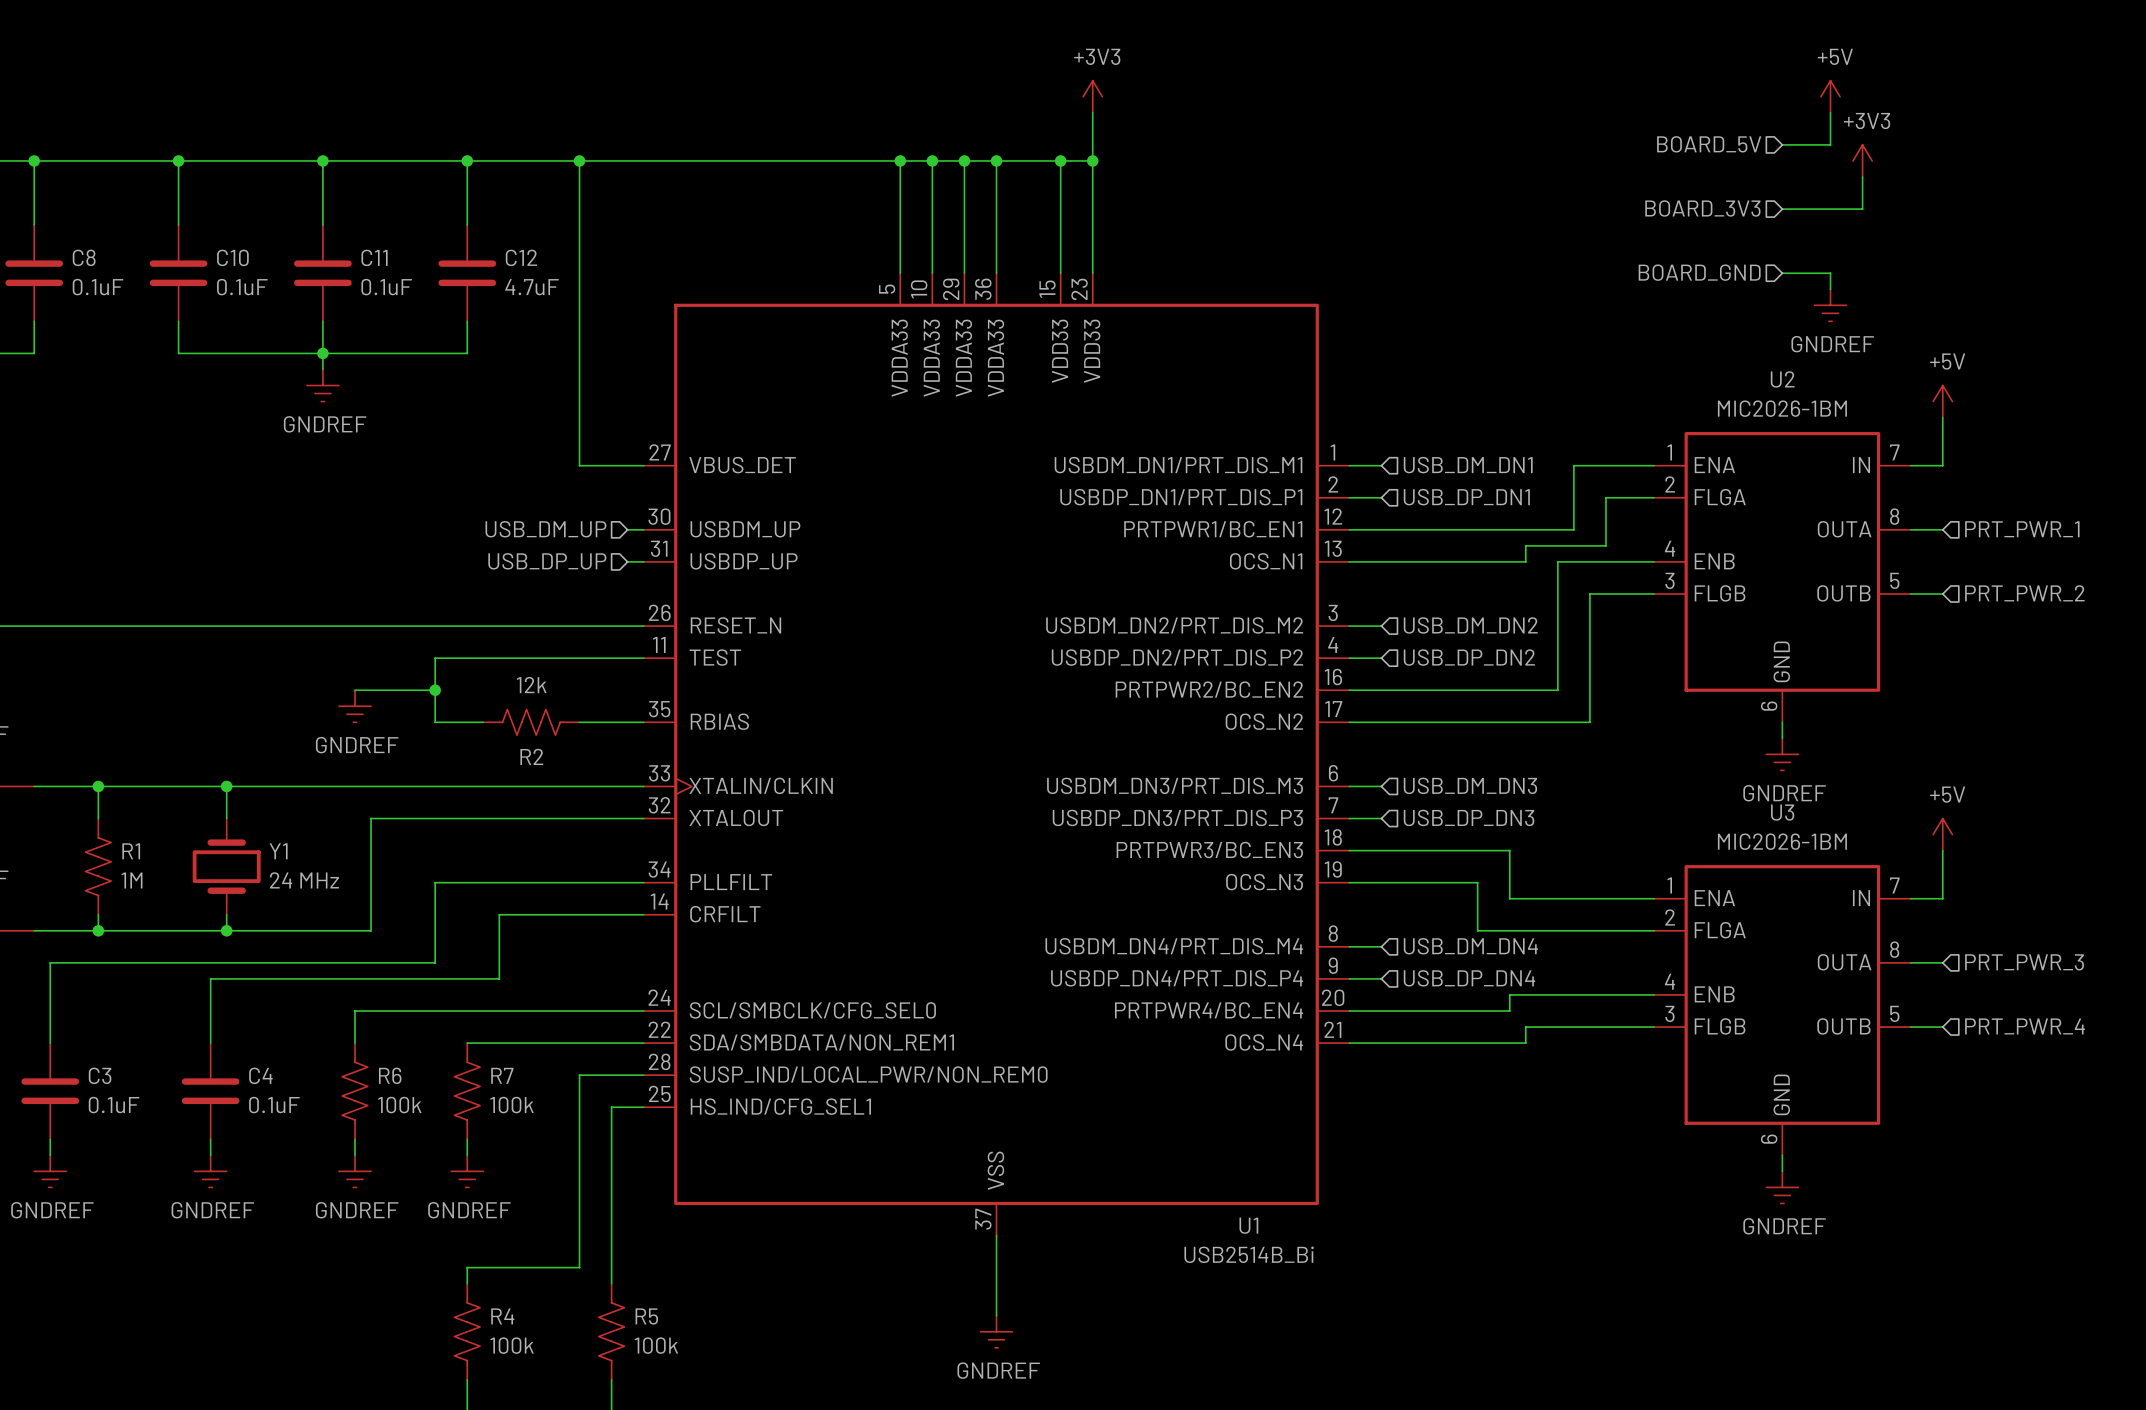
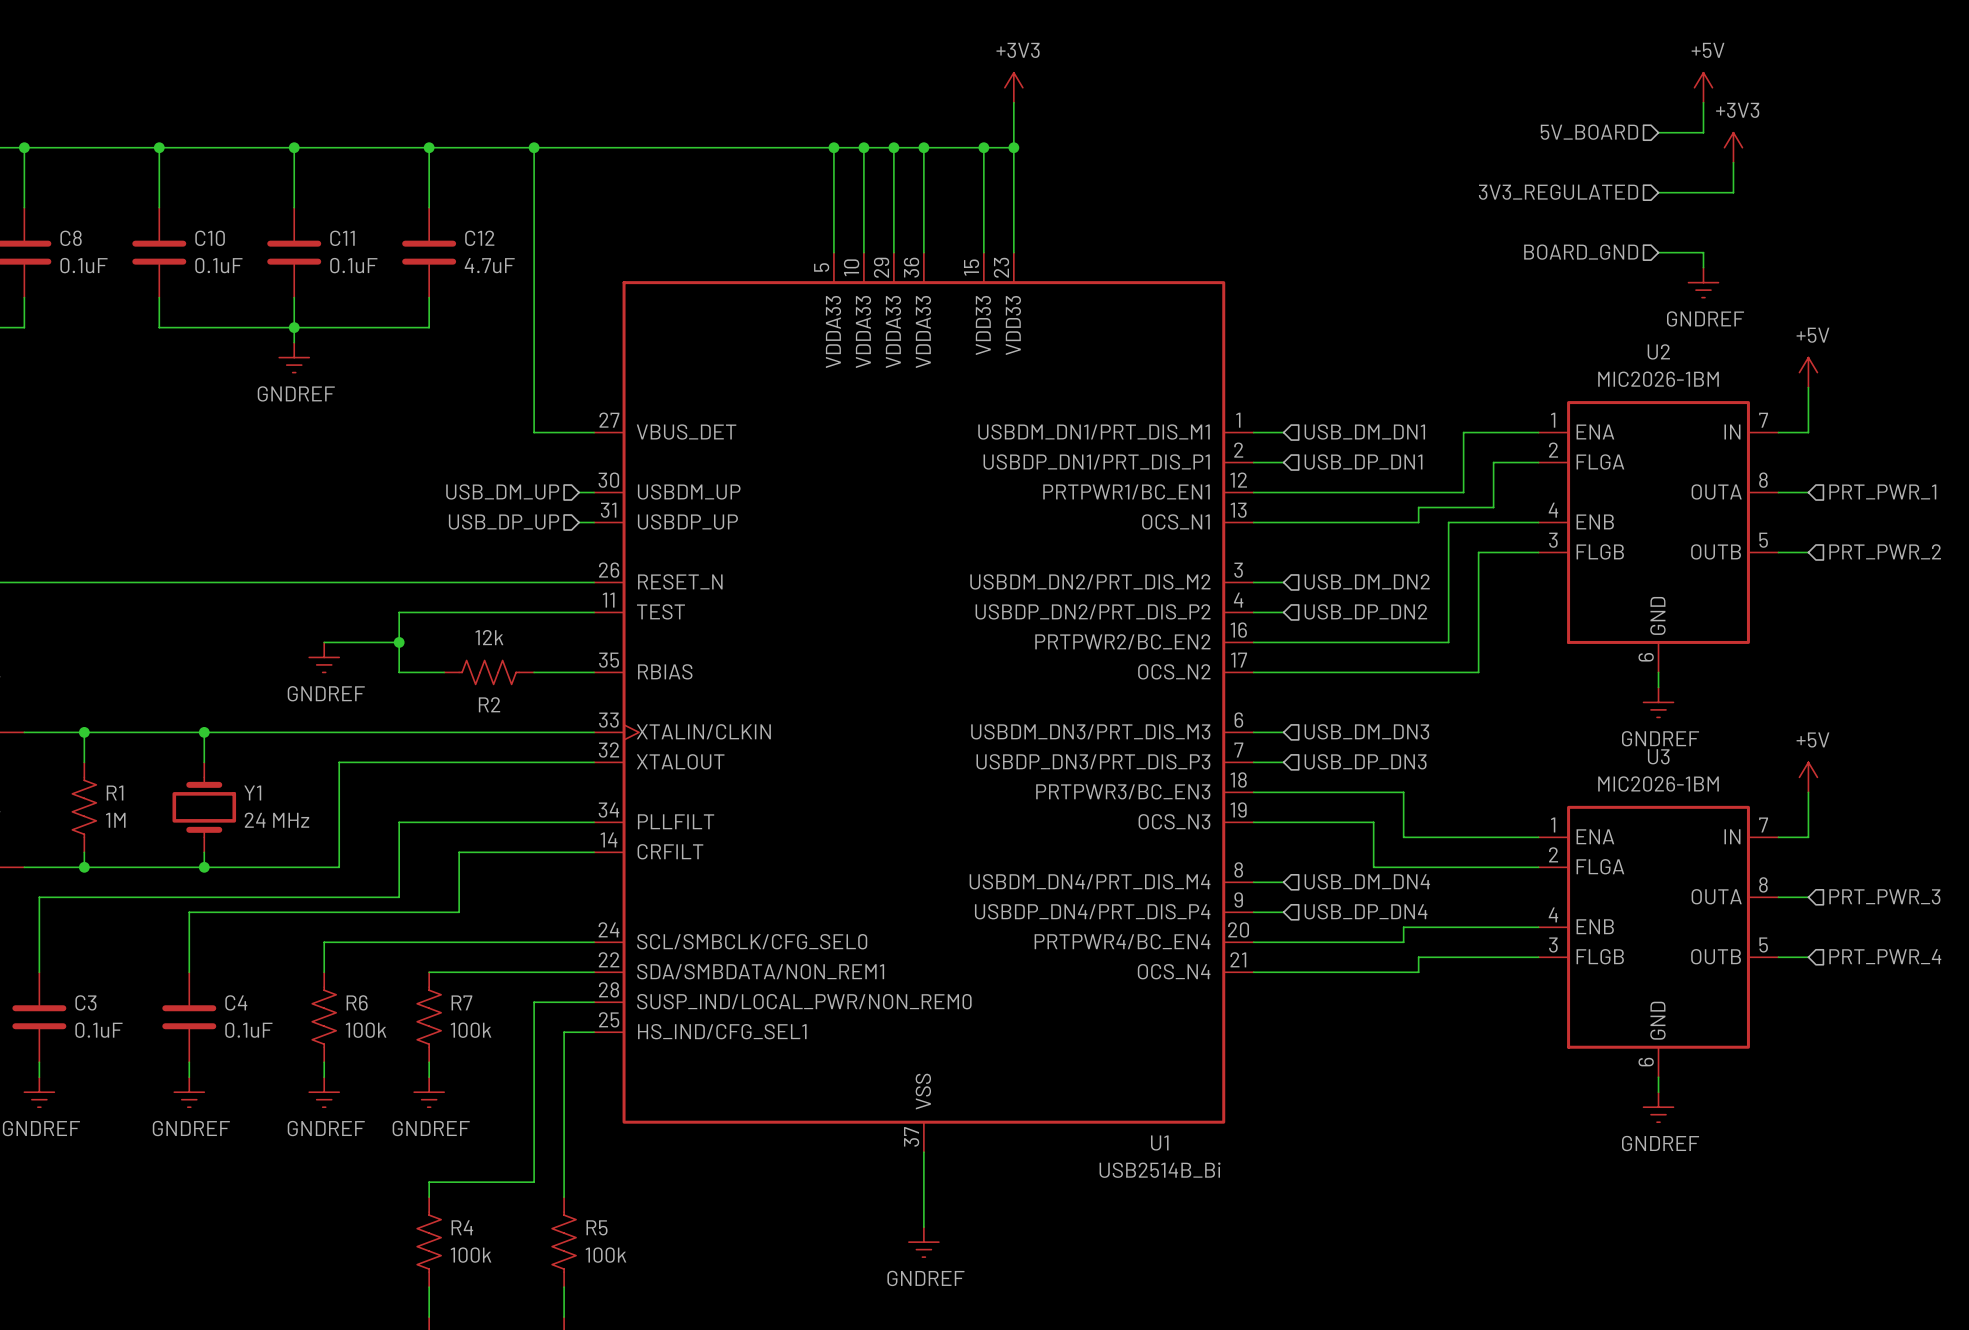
hierarchical label: BOARD_5V (1709, 144) -> 5V_BOARD (1589, 132)
hierarchical label: BOARD_3V3 (1702, 208) -> 3V3_REGULATED (1558, 192)

